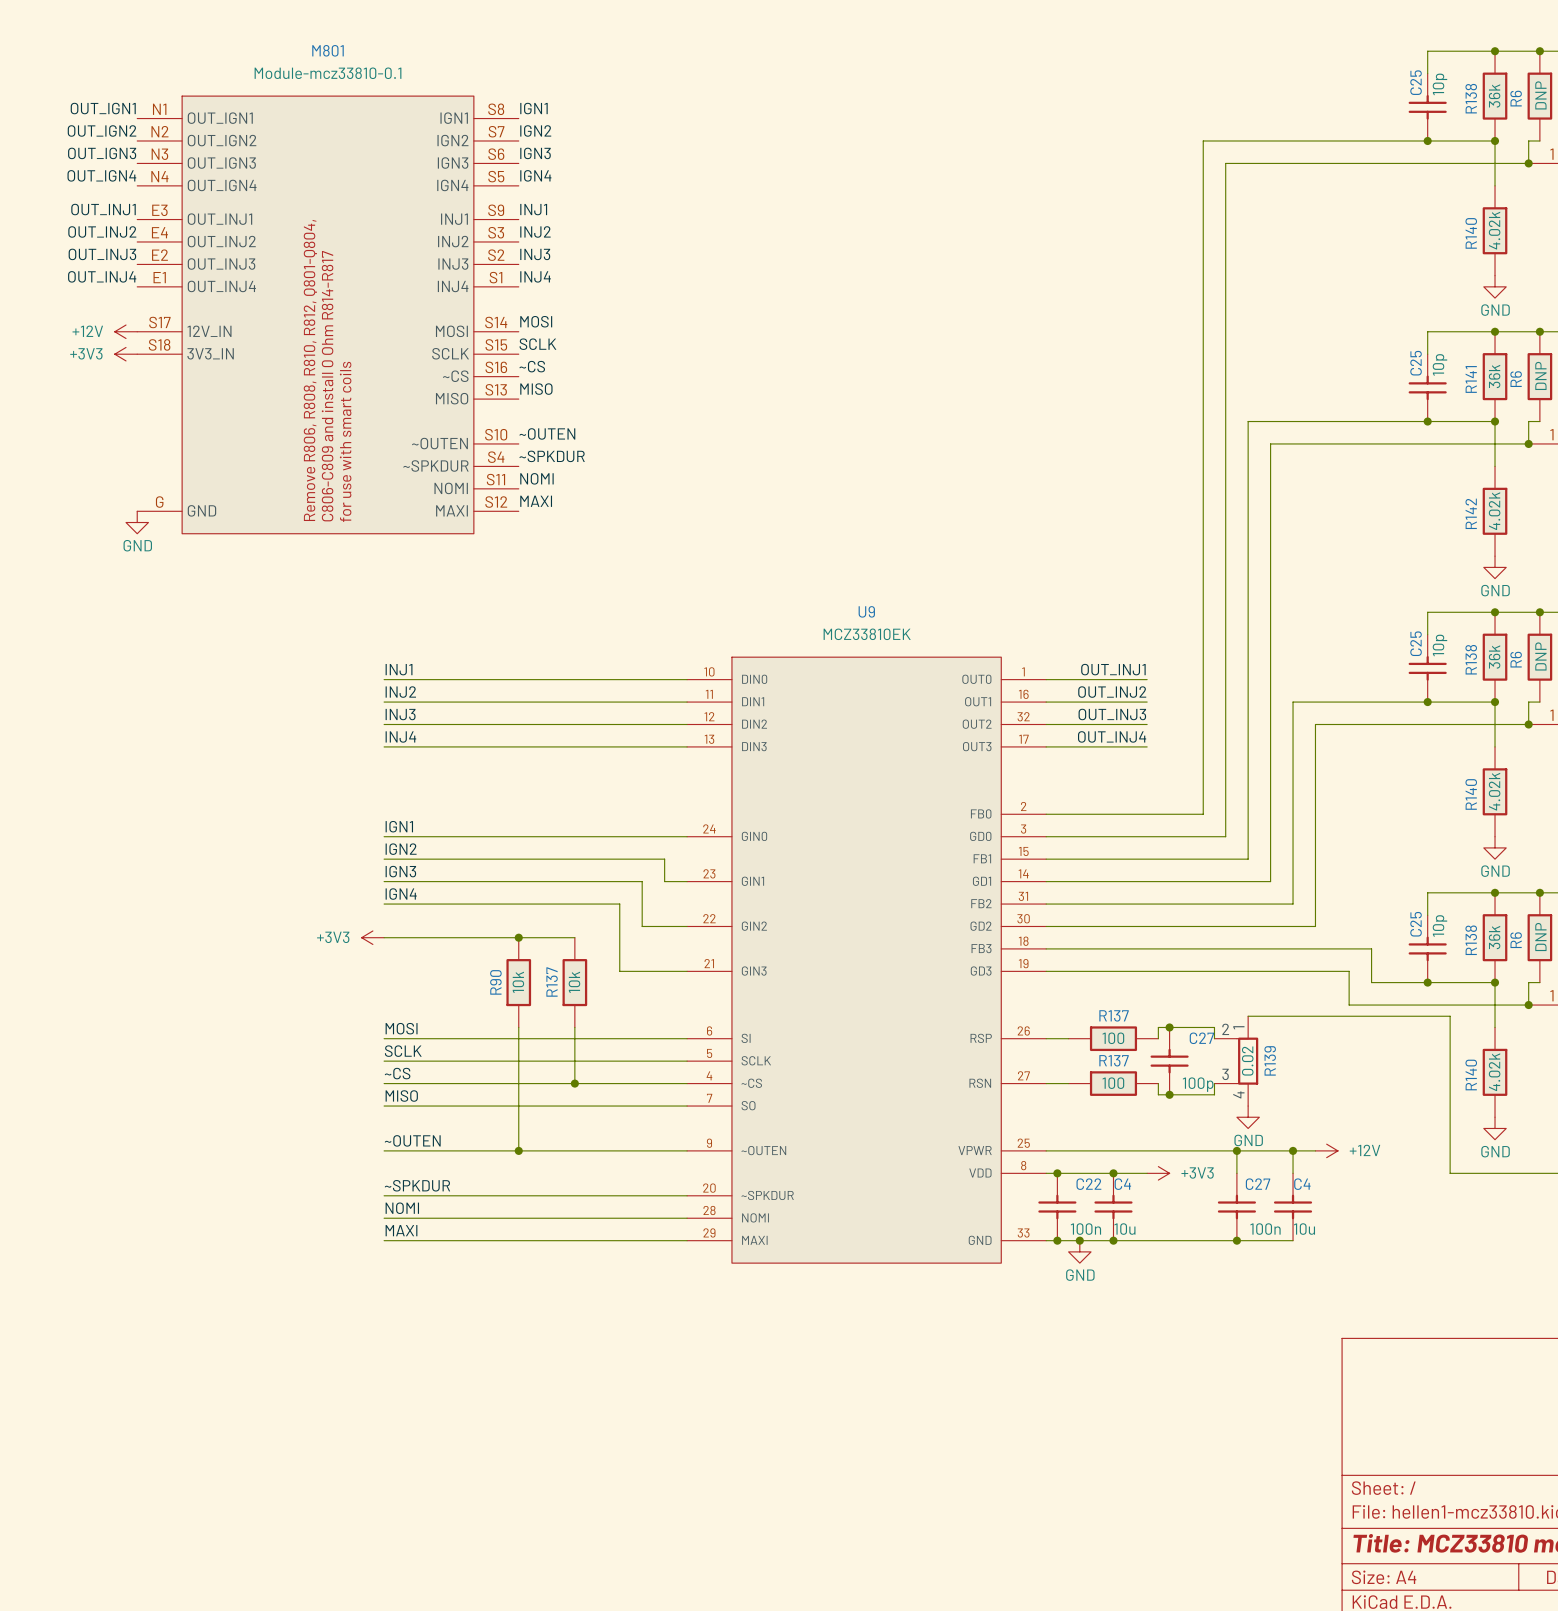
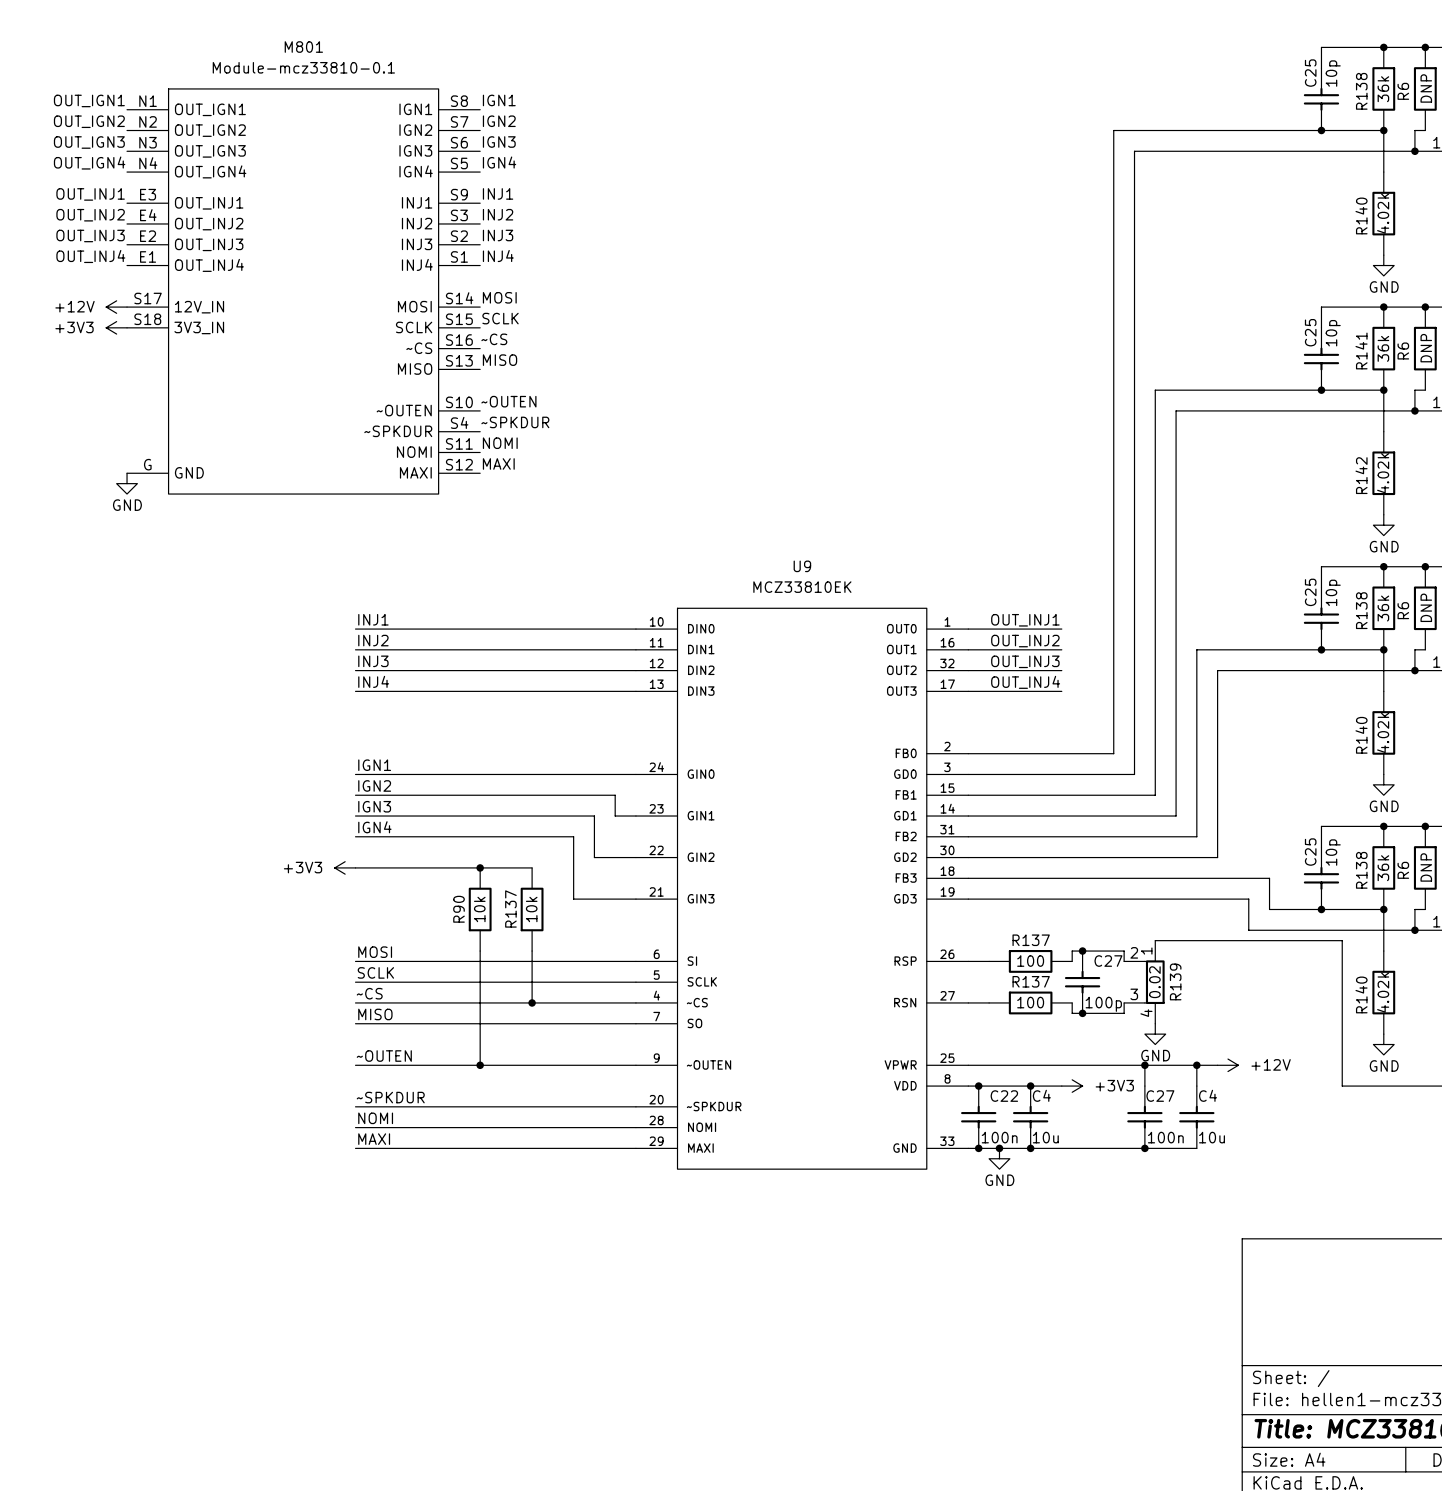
M801 text: Remove R806, R808, R810, R812, Q801-Q804, (310, 370) -> none
M801 text: C806-C809 and install 0 Ohm R814-R817 (327, 386) -> none
M801 text: for use with smart coils (345, 441) -> none

